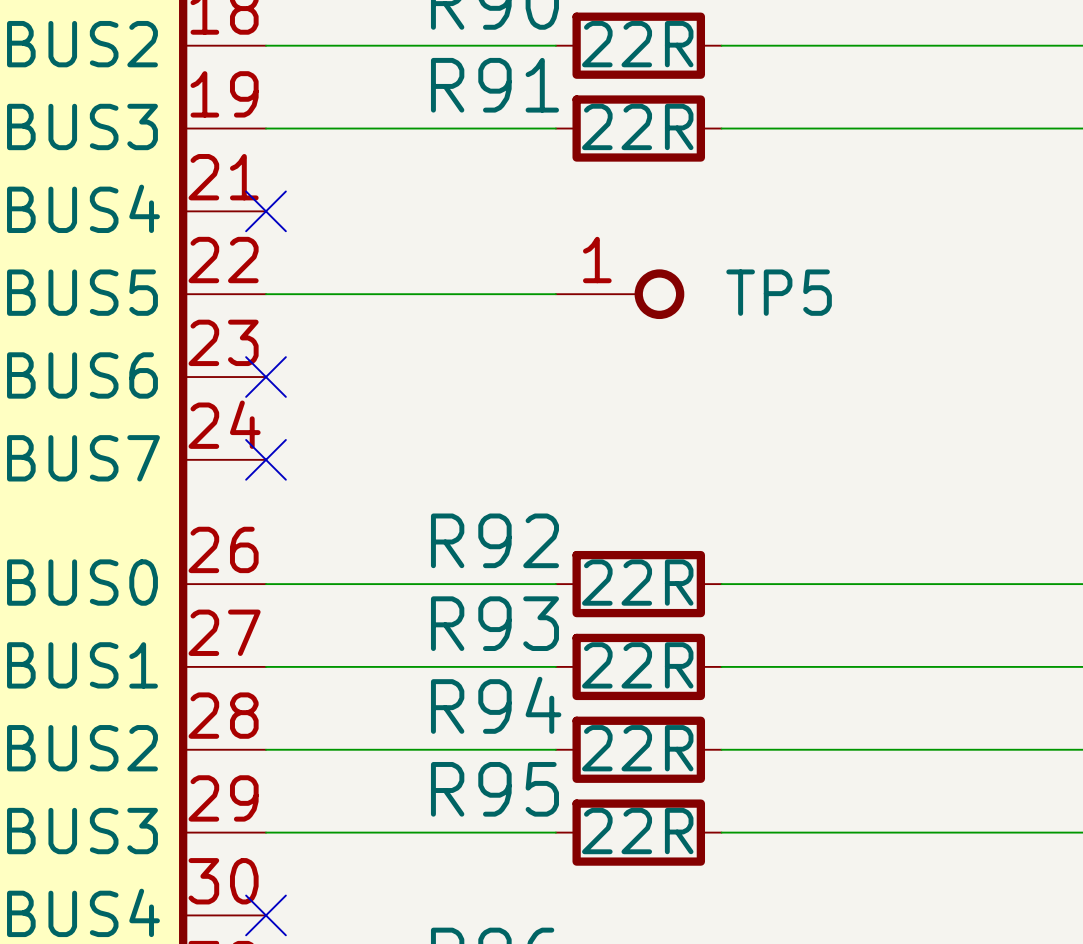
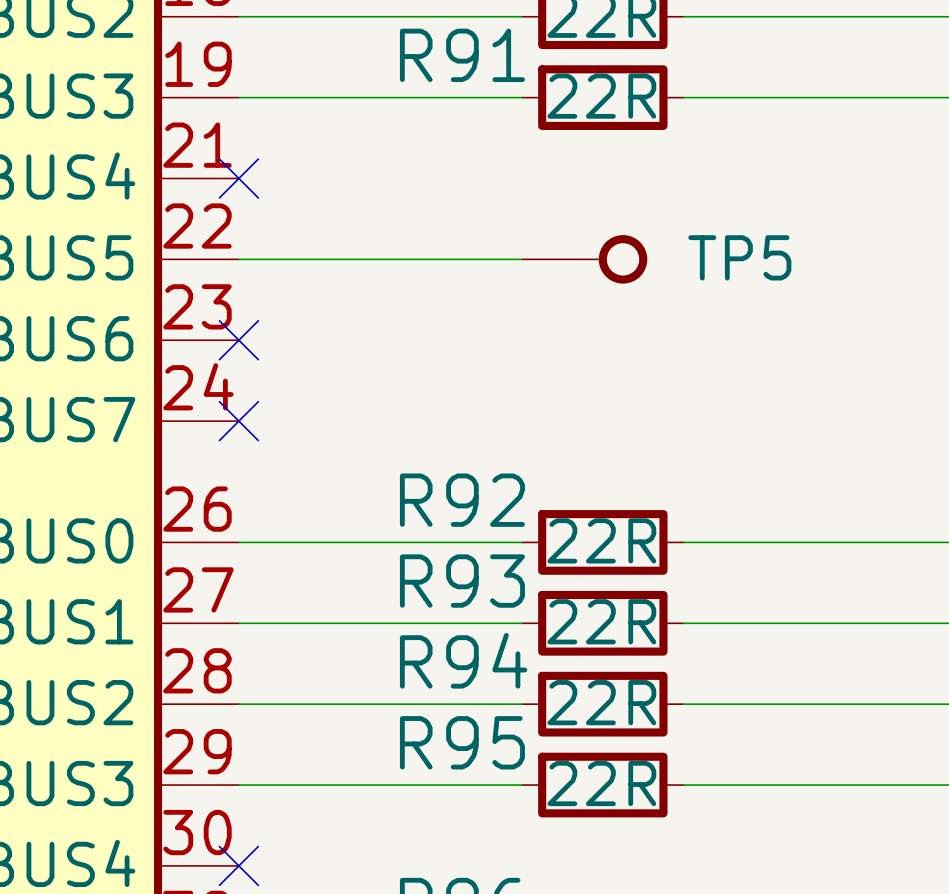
TP5 pin number: 1 (597, 260) -> none

